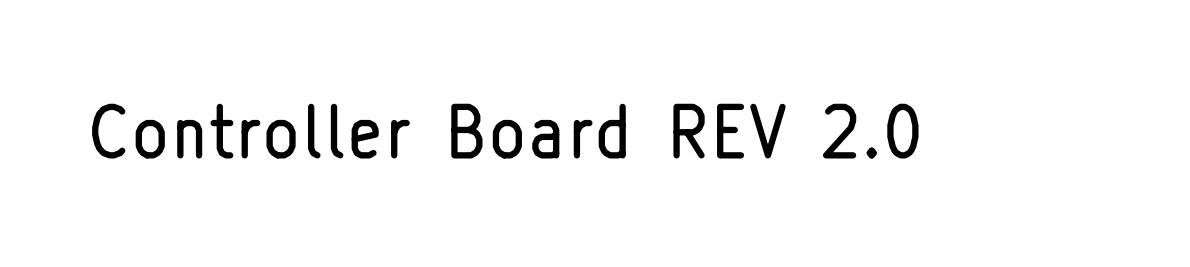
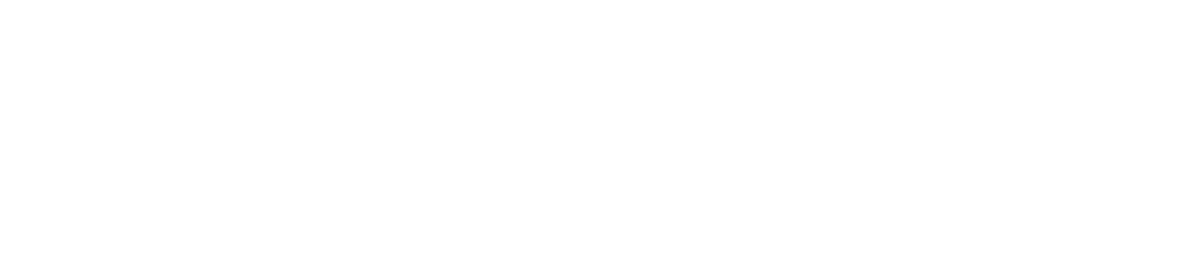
text: Controller Board REV 2.0 (505, 131) -> none

